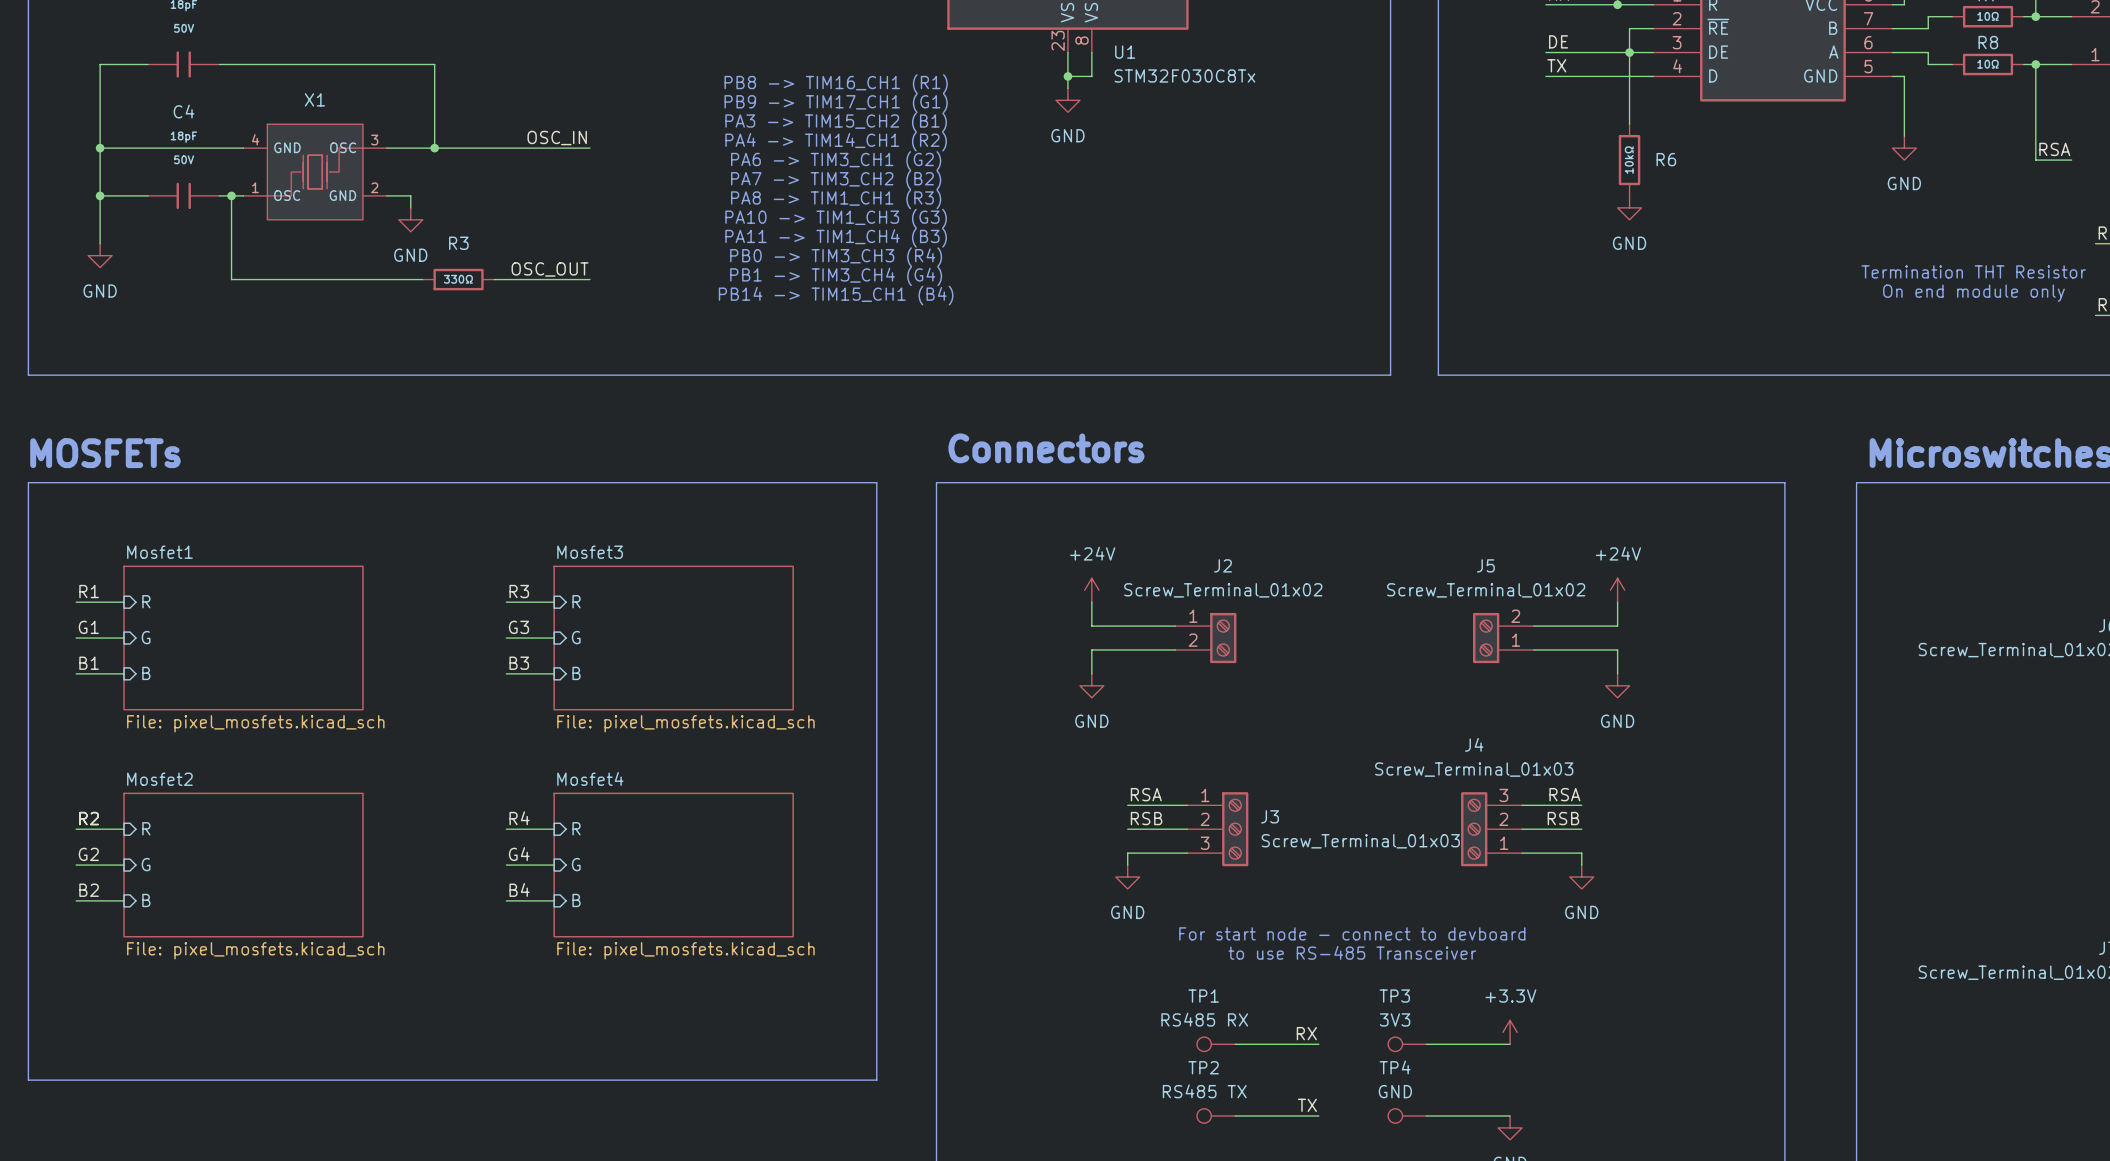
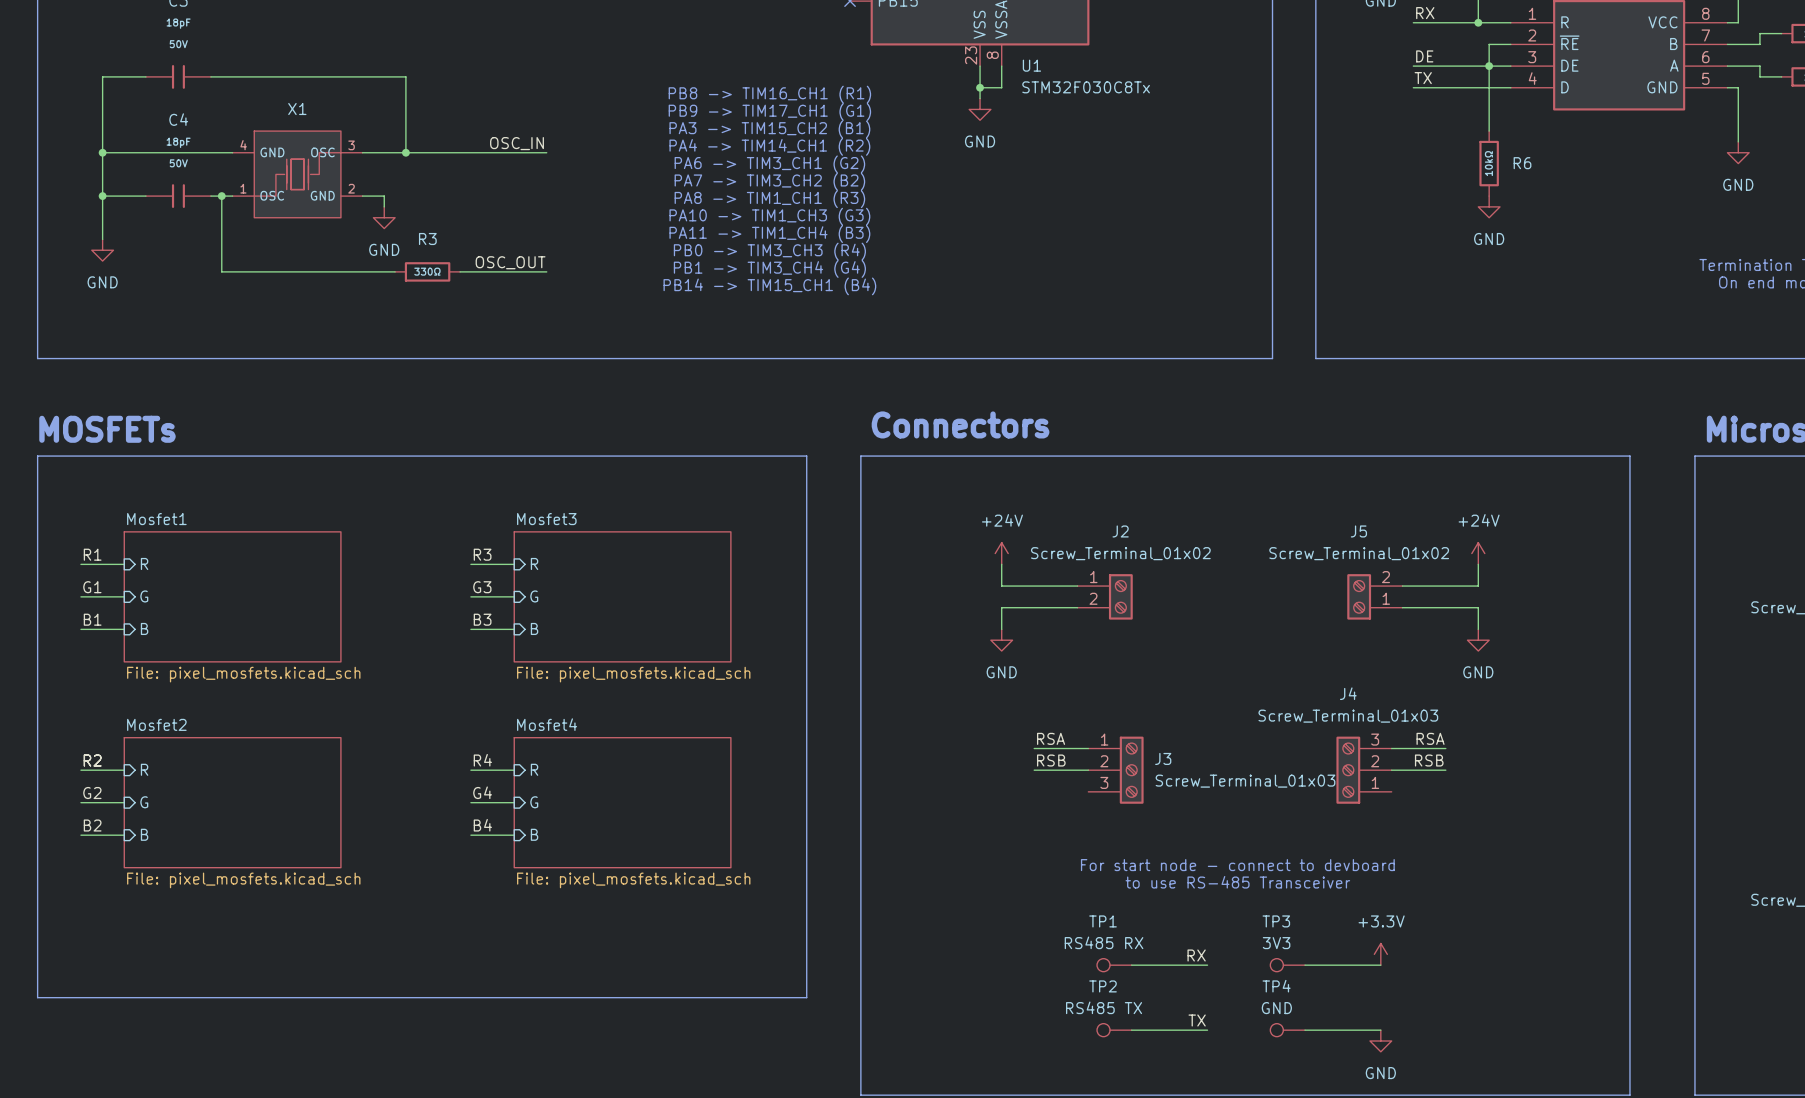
wire: (1187, 853) (1127, 853) (1127, 865) -> none
wire: (1522, 853) (1581, 853) (1581, 865) -> none
power symbol: GND (1127, 877) -> none
power symbol: GND (1581, 877) -> none

